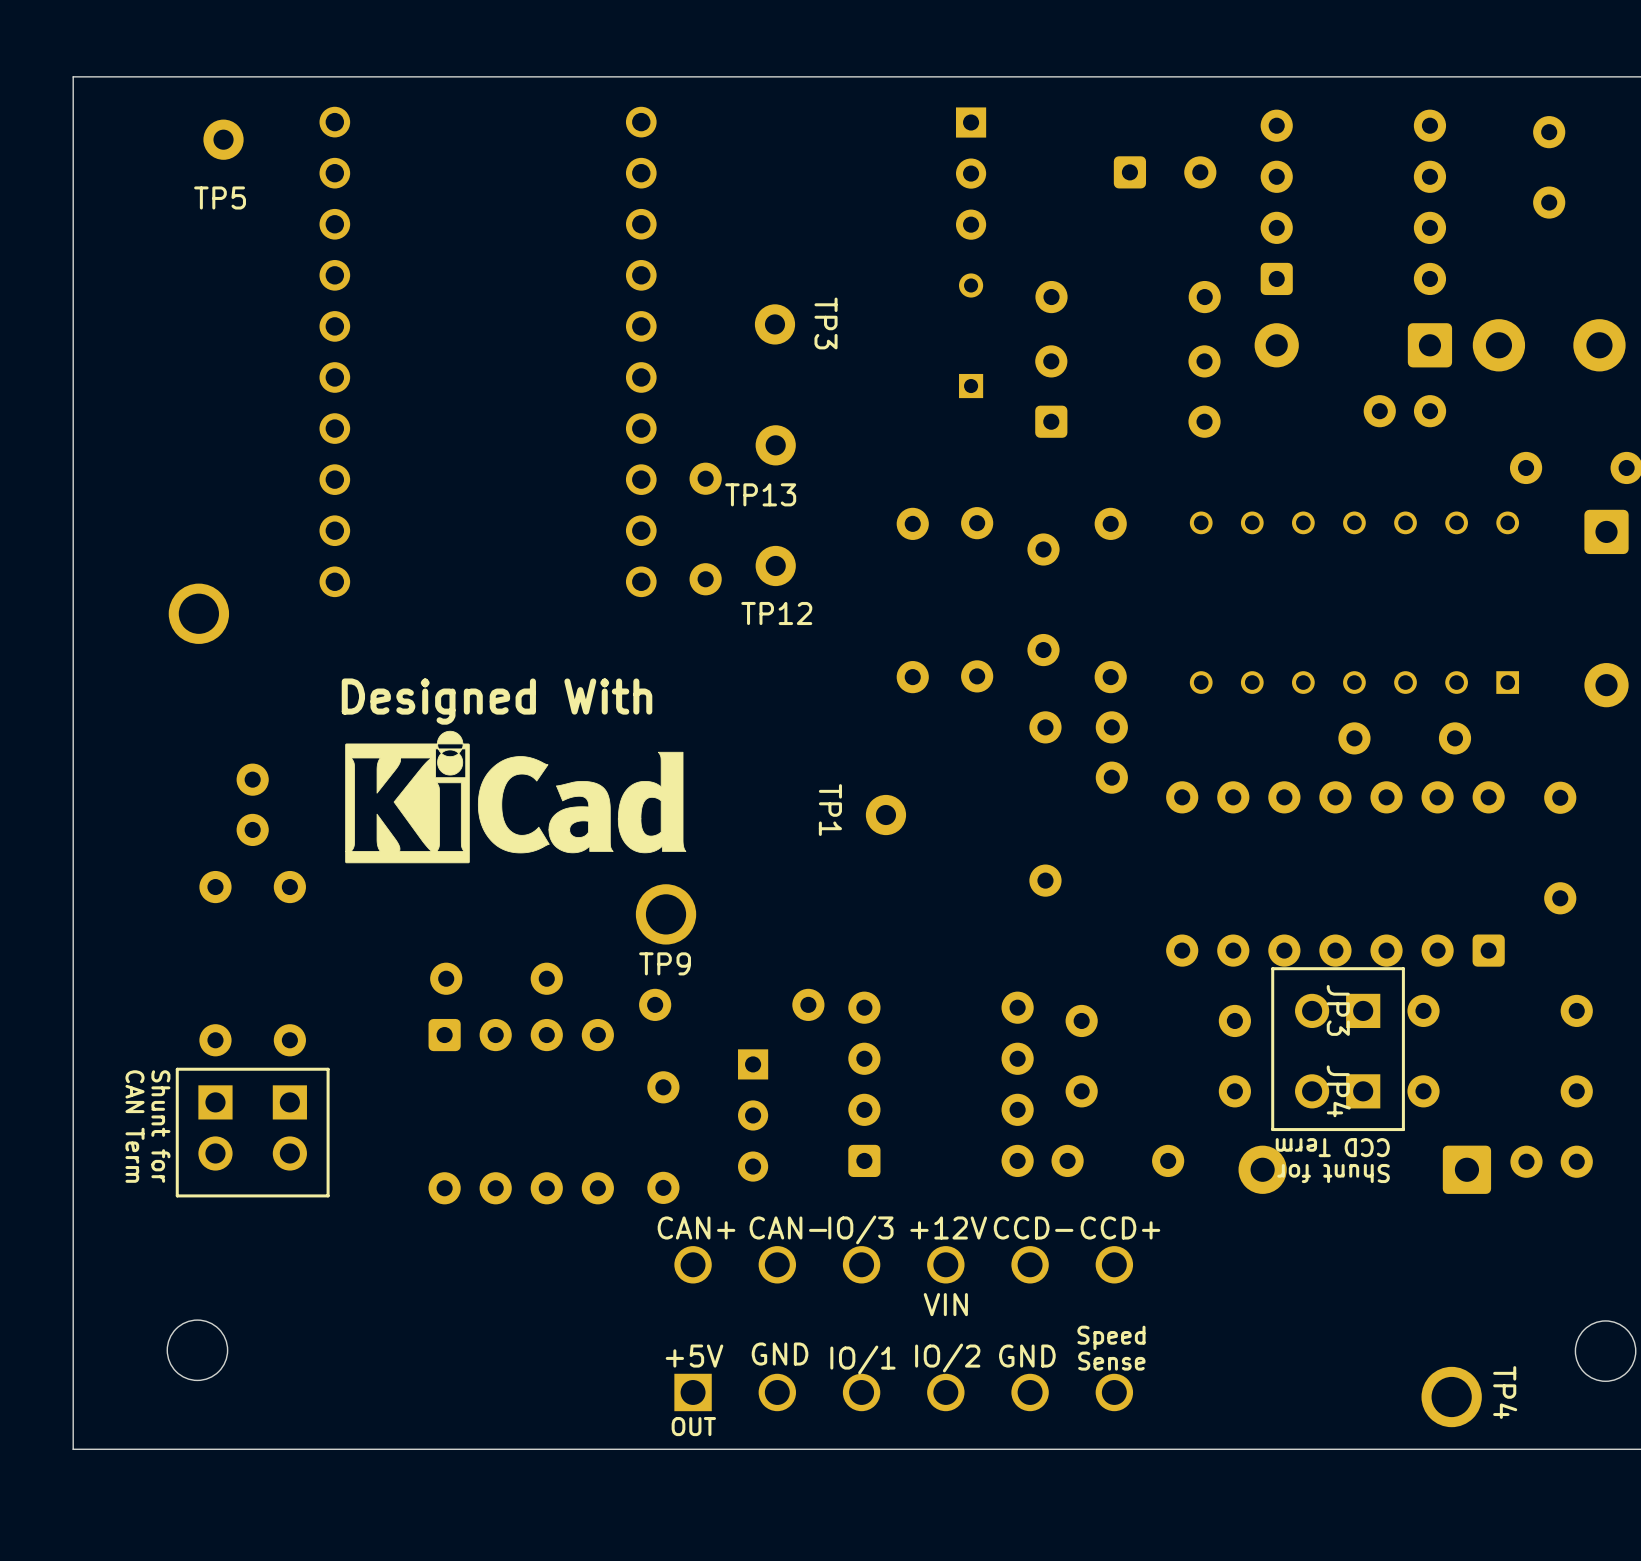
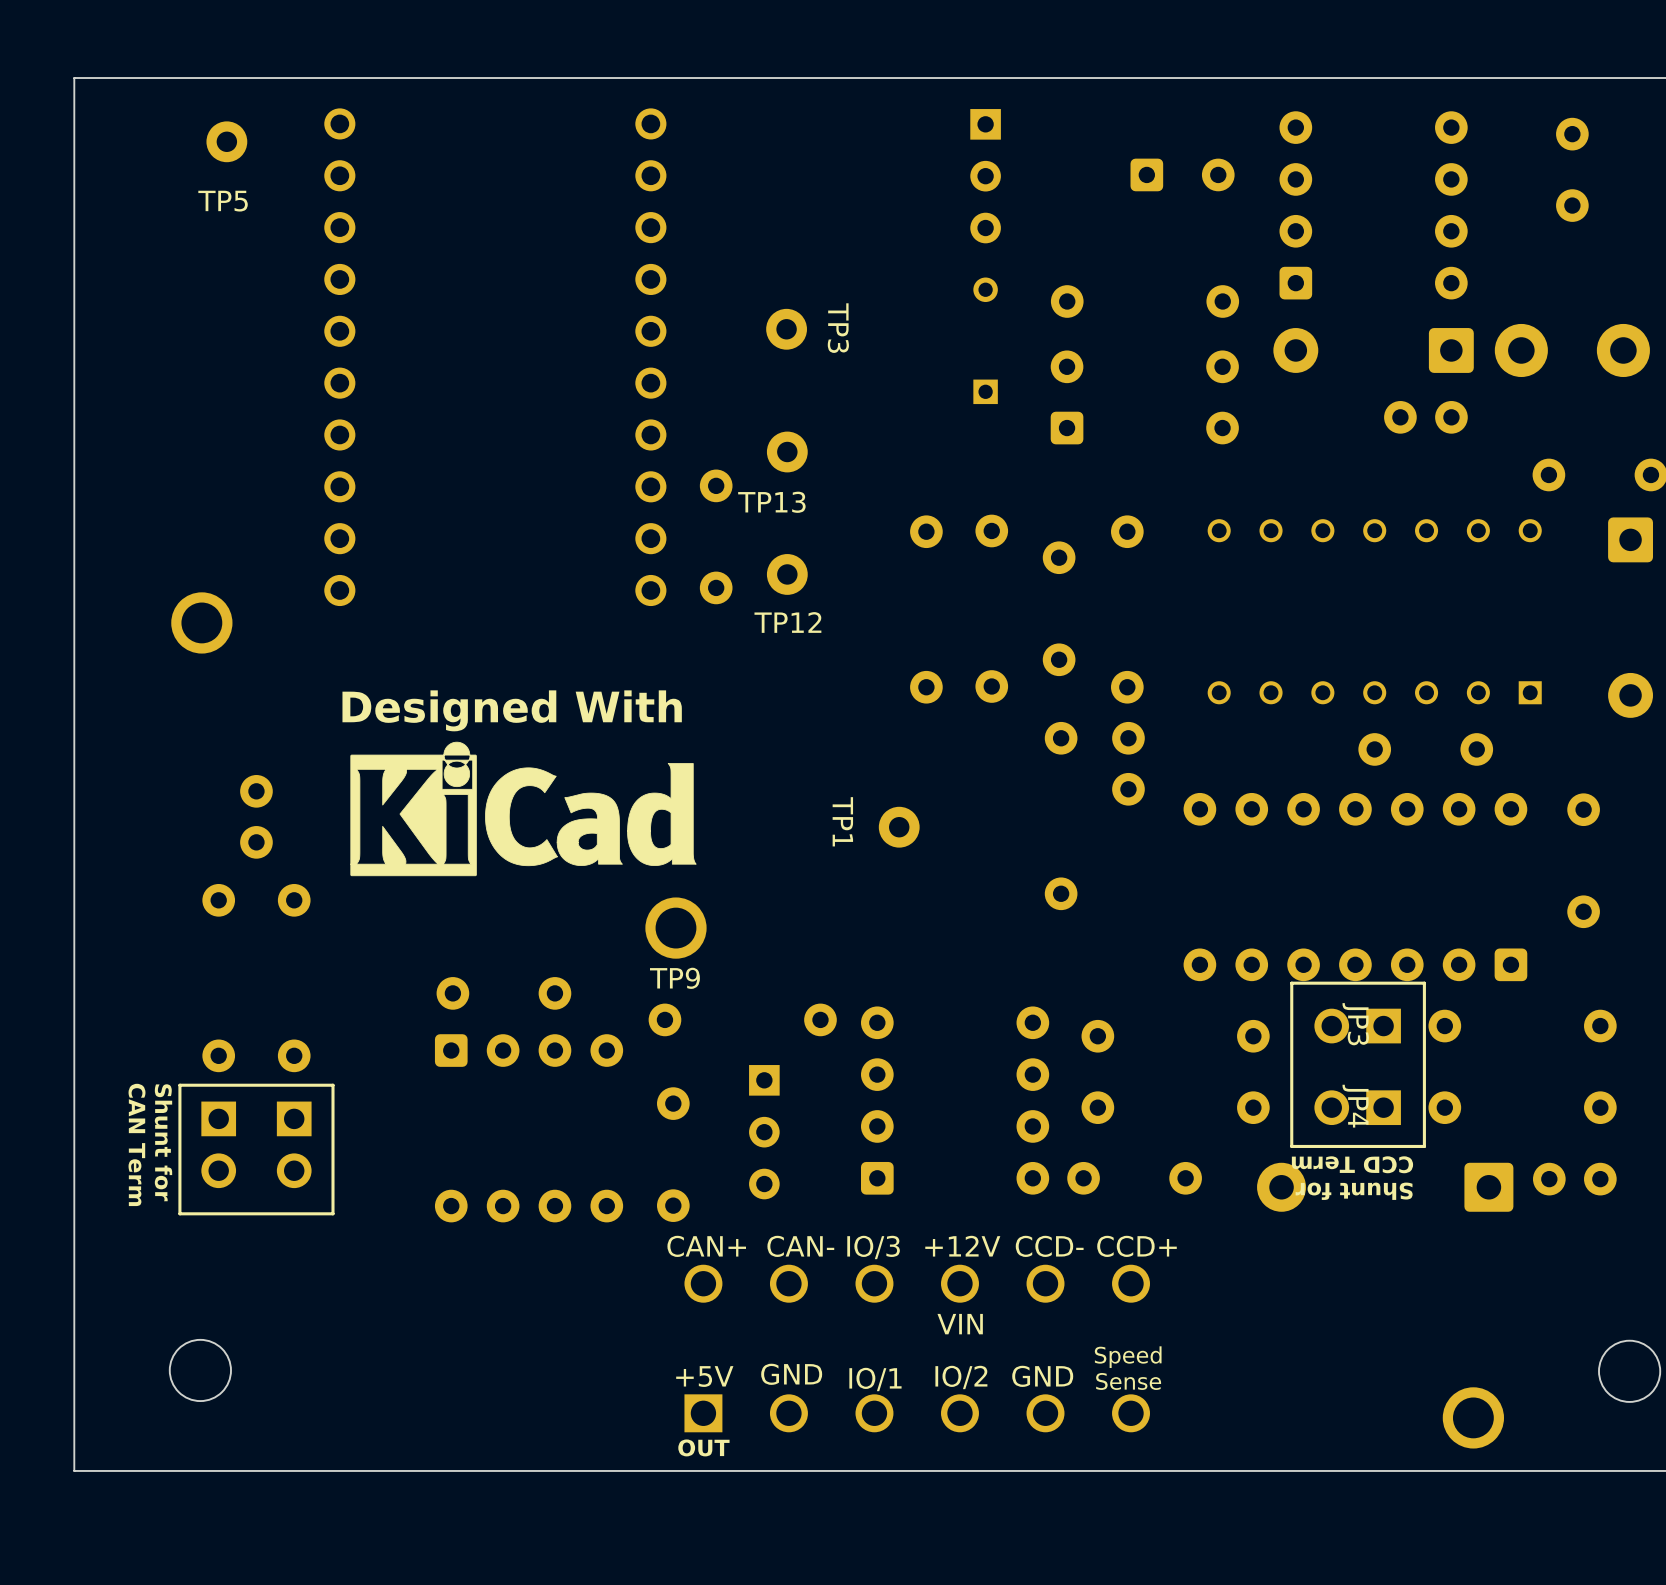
TP4 name: TP4 (1505, 1392) -> none

